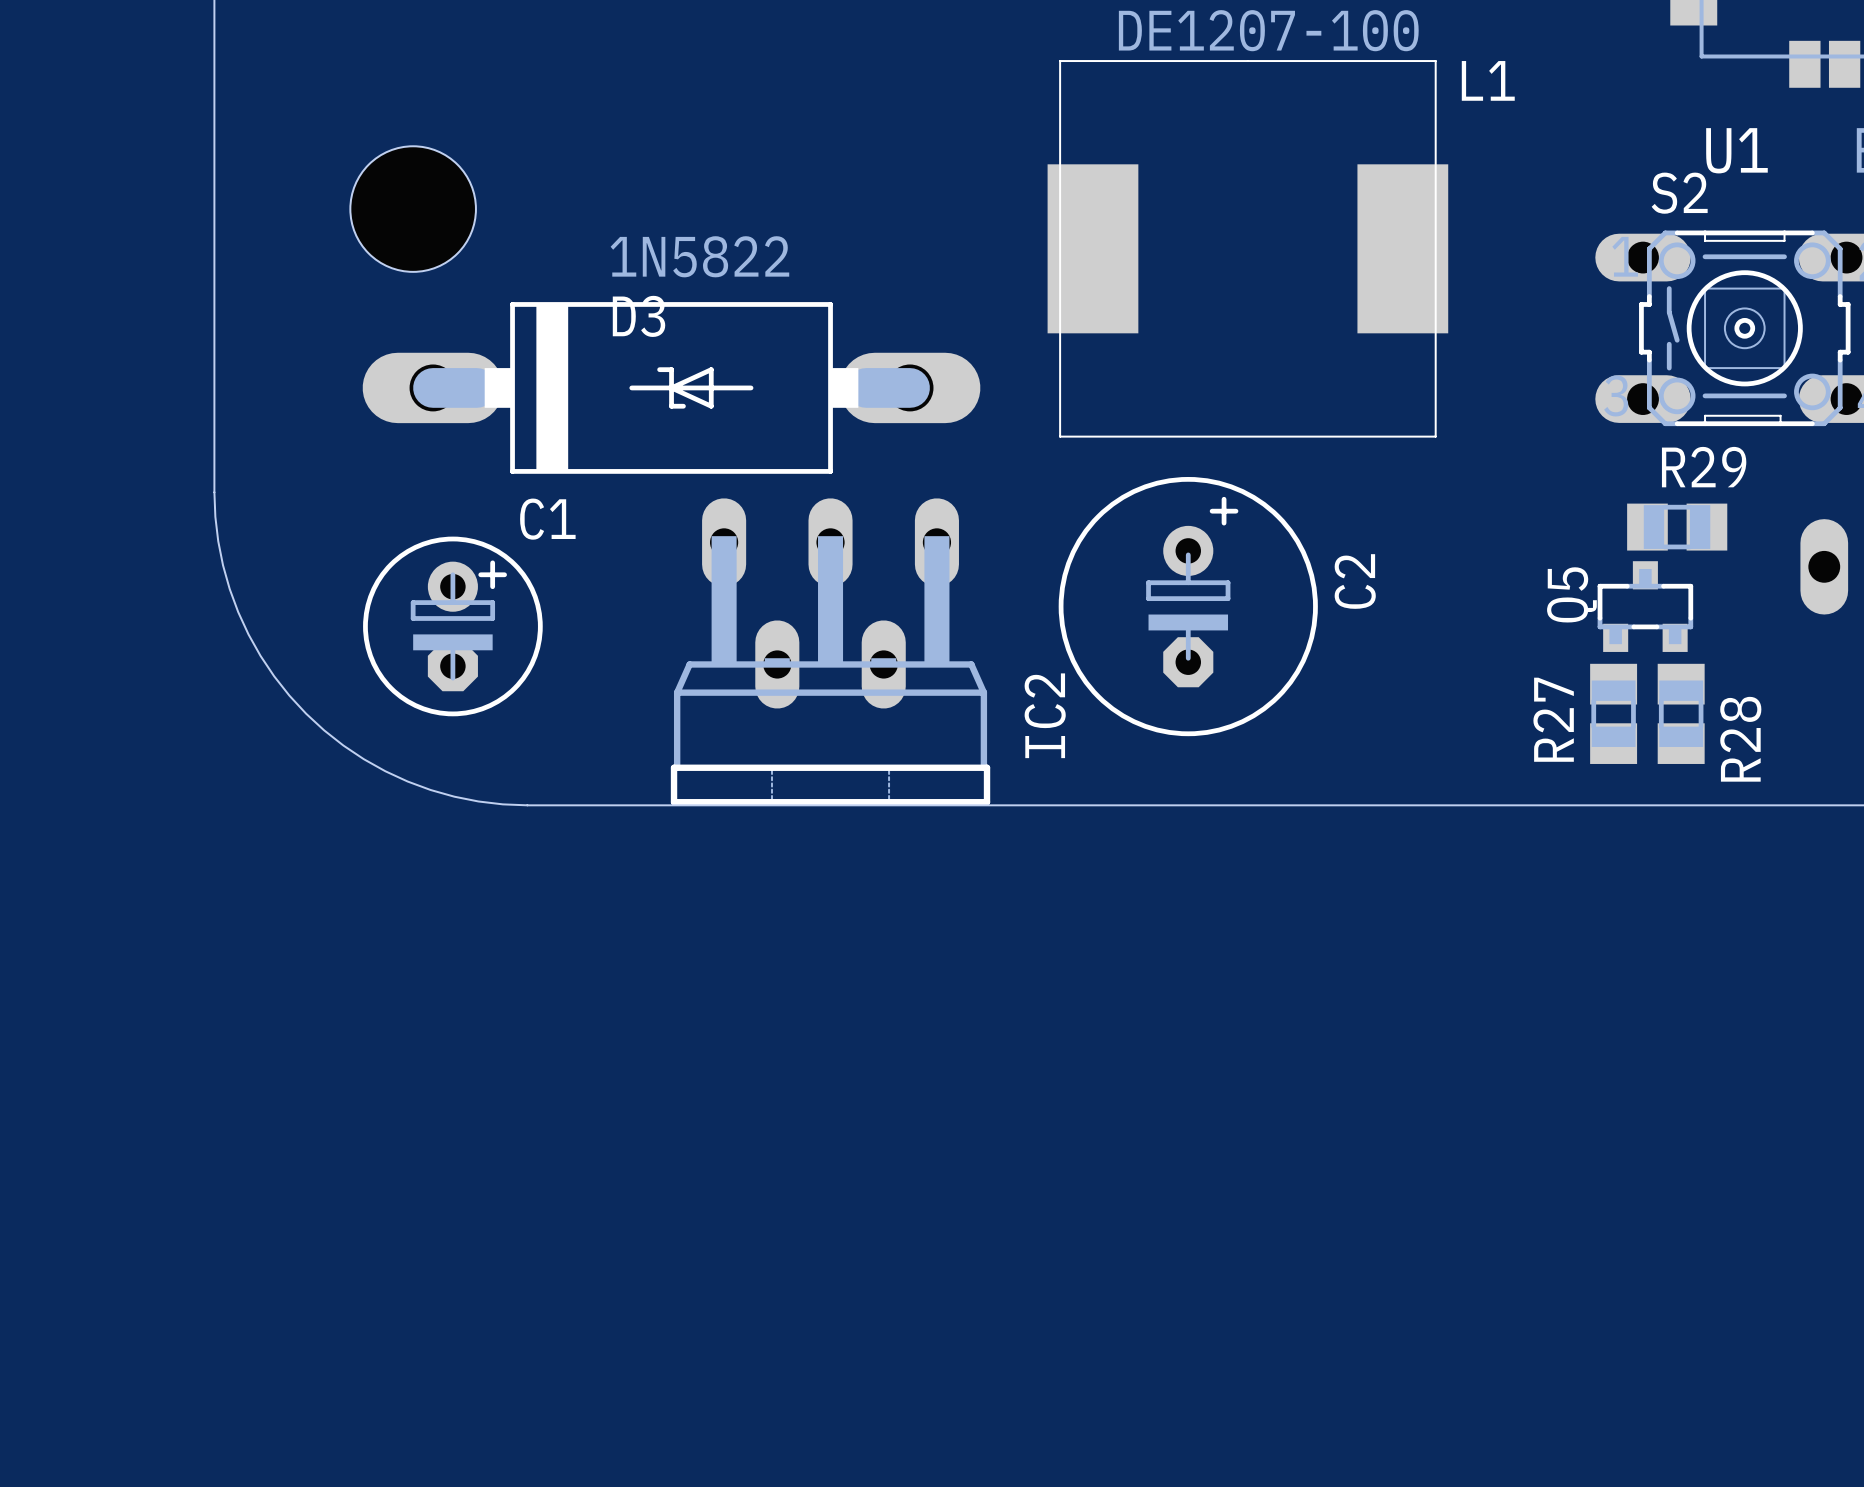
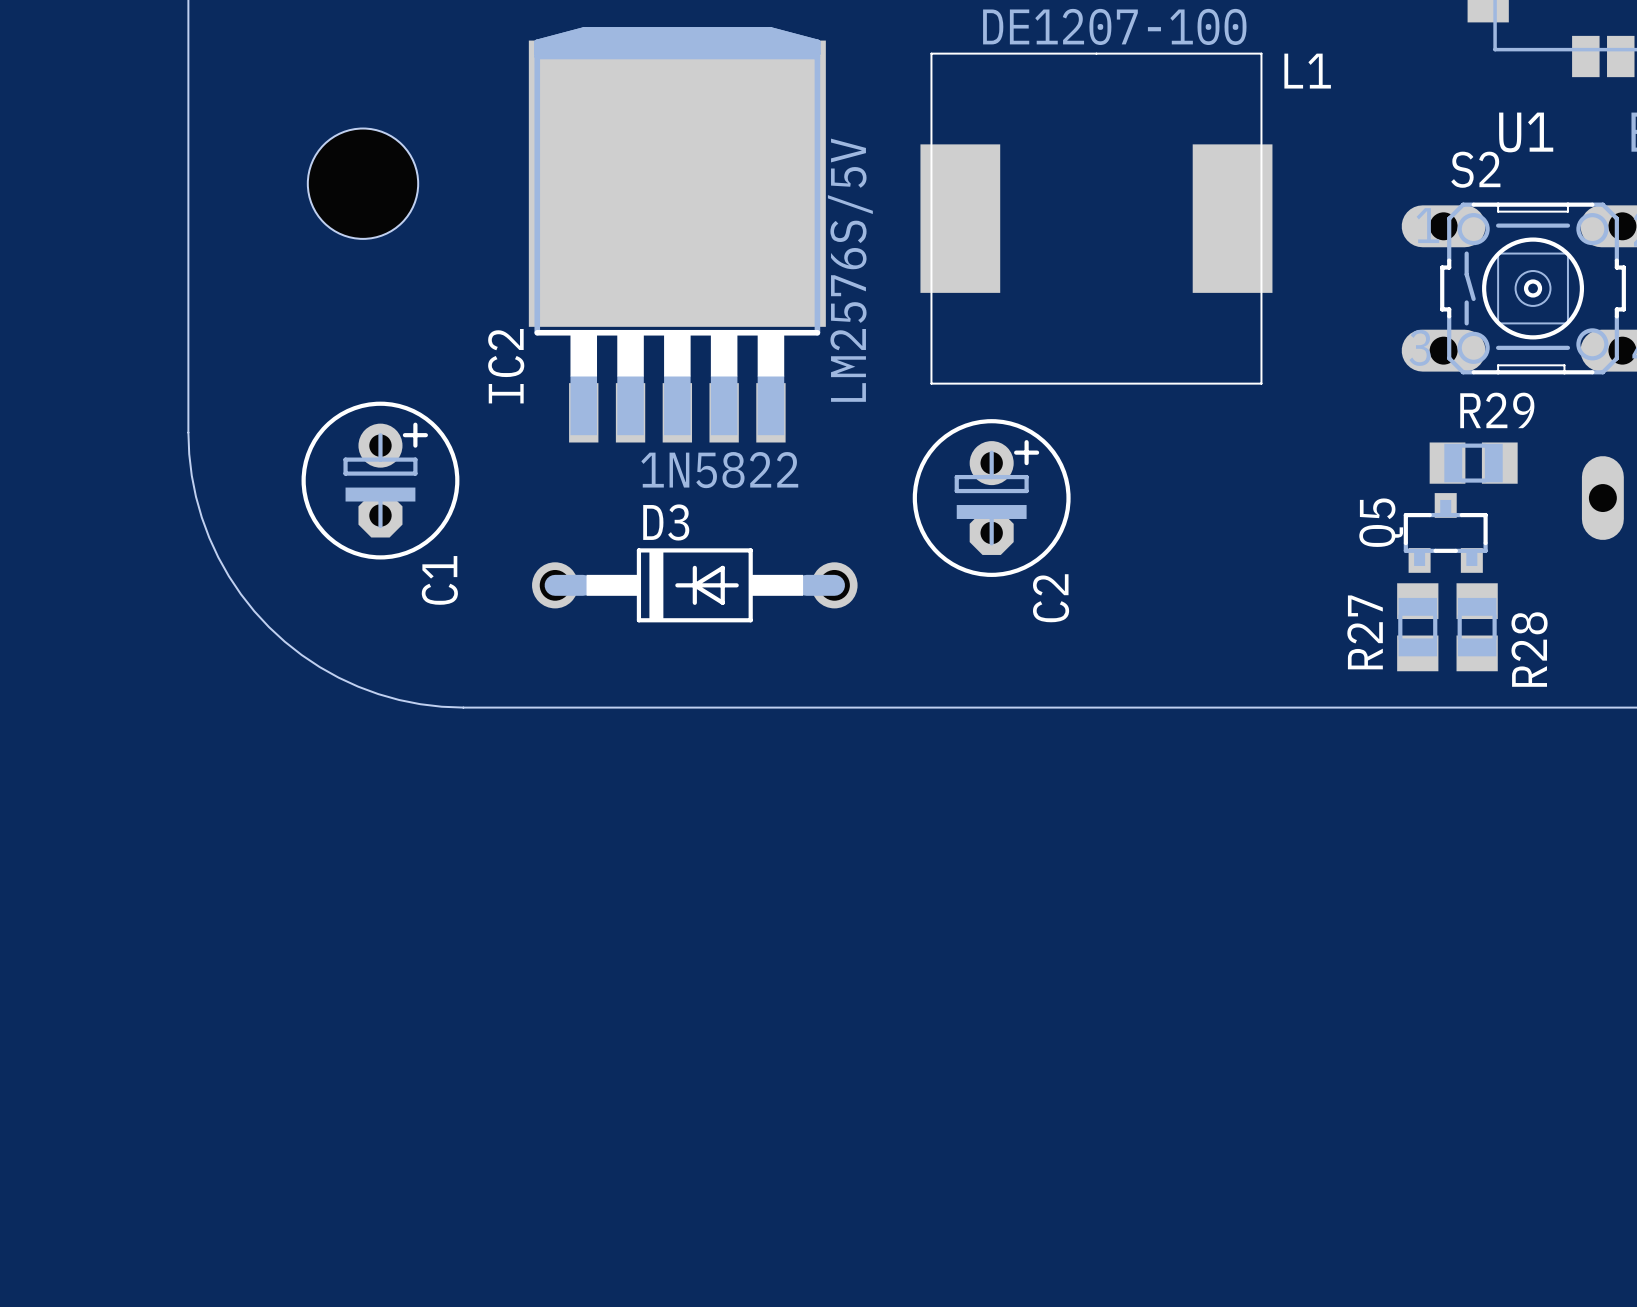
D3 footprint: [362, 302, 981, 474] -> [532, 548, 858, 623]
IC2 value: none -> LM2576S/5V (850, 270)
C2 footprint: [1058, 476, 1318, 737] -> [912, 419, 1071, 577]
IC2 footprint: [670, 498, 991, 806] -> [528, 27, 826, 443]
C1 name rotation: 0° (547, 519) -> 90° counterclockwise (439, 580)
C1 name position: C1 (547, 519) -> C1 (439, 580)
C2 name position: C2 (1355, 581) -> C2 (1051, 598)
C1 position: (452, 626) -> (380, 480)
IC2 name position: IC2 (1045, 715) -> IC2 (506, 366)

